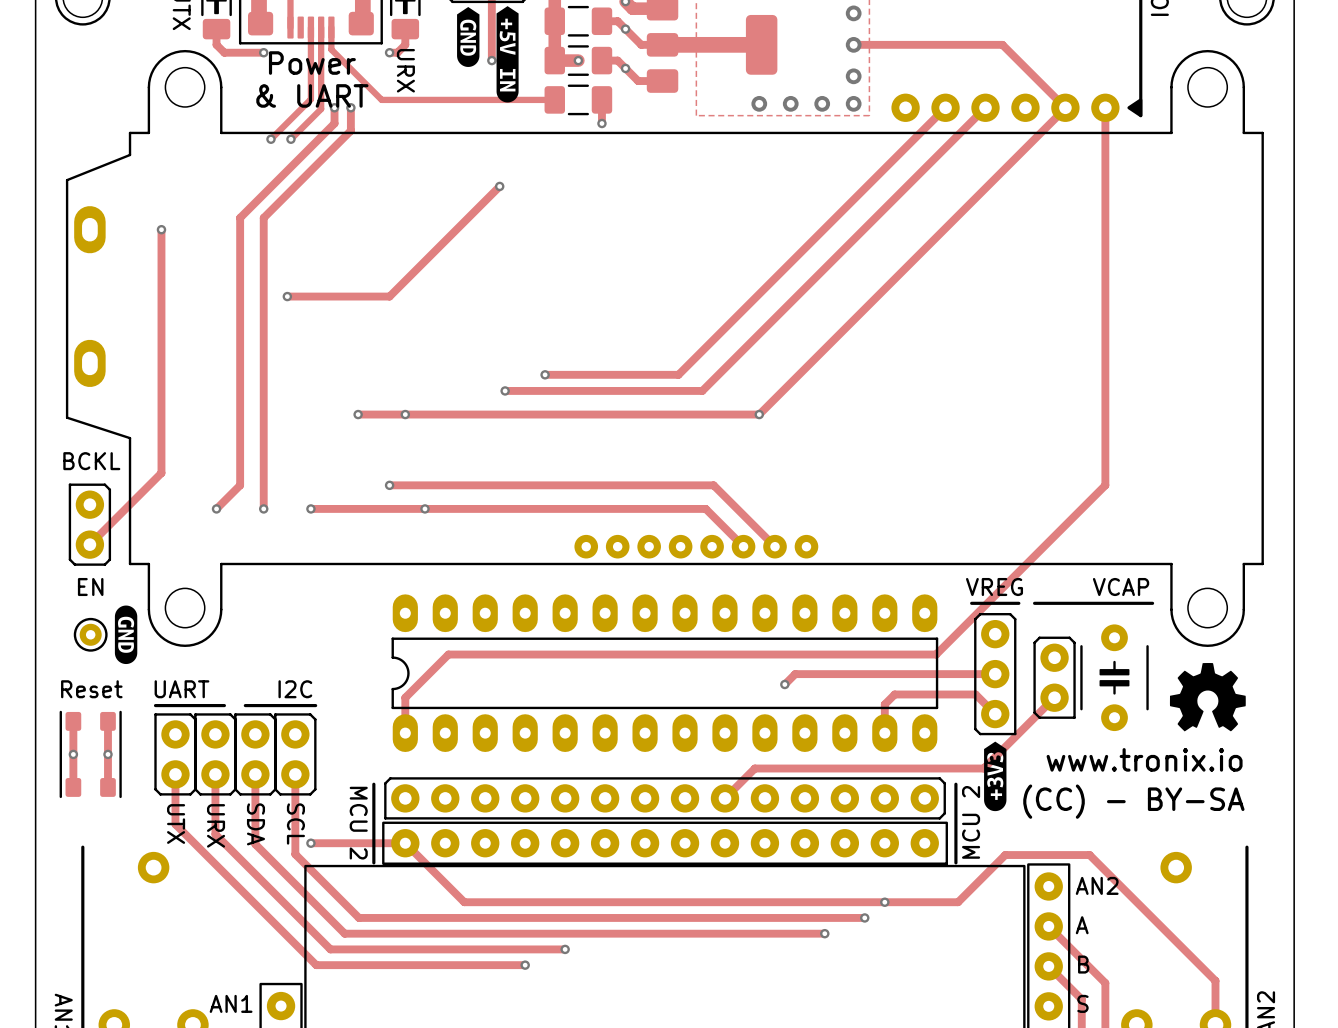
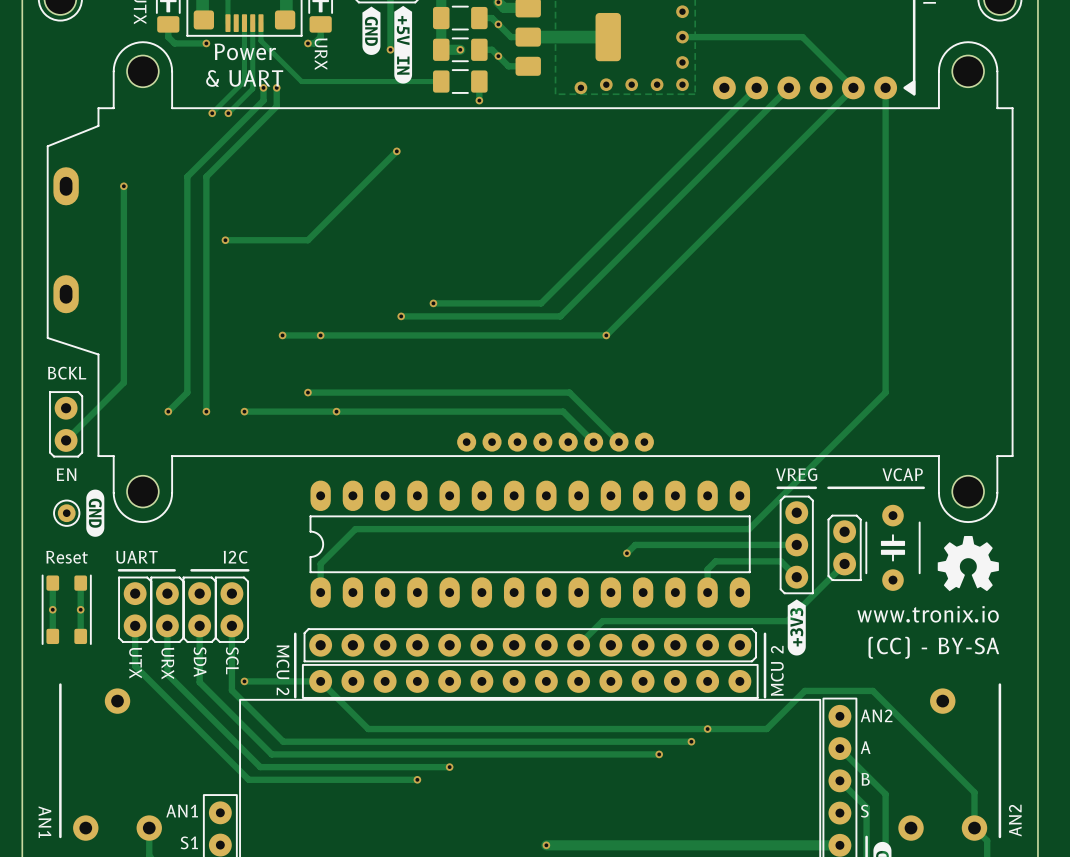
via: none -> (580, 87)

